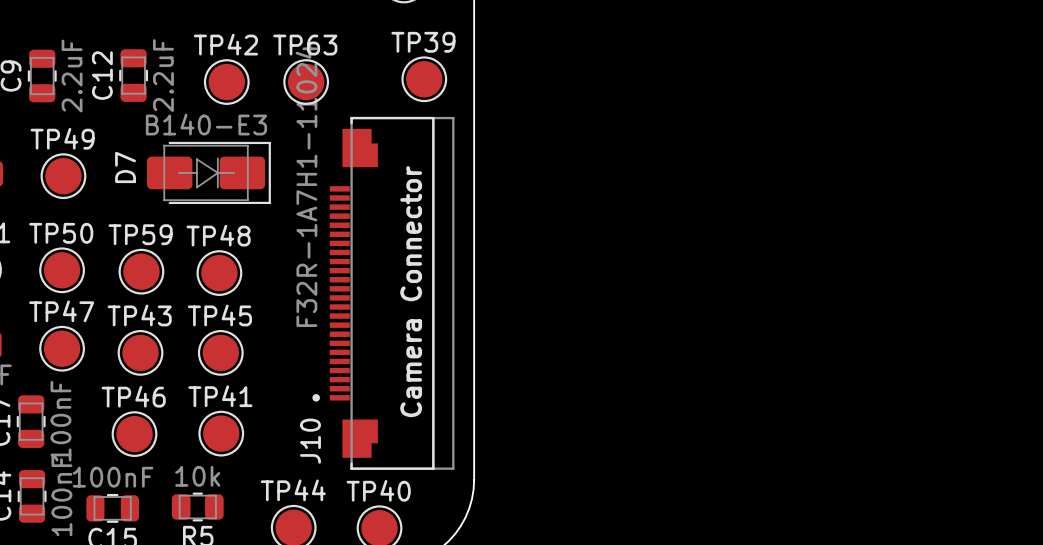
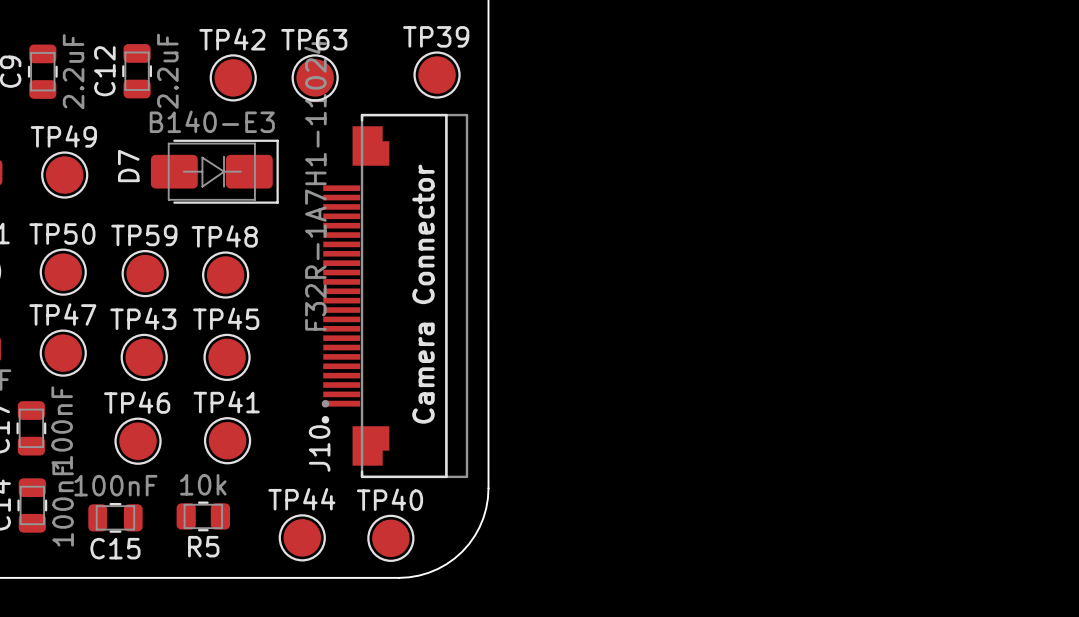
J10 footprint: [312, 116, 455, 470] -> [321, 113, 469, 479]

